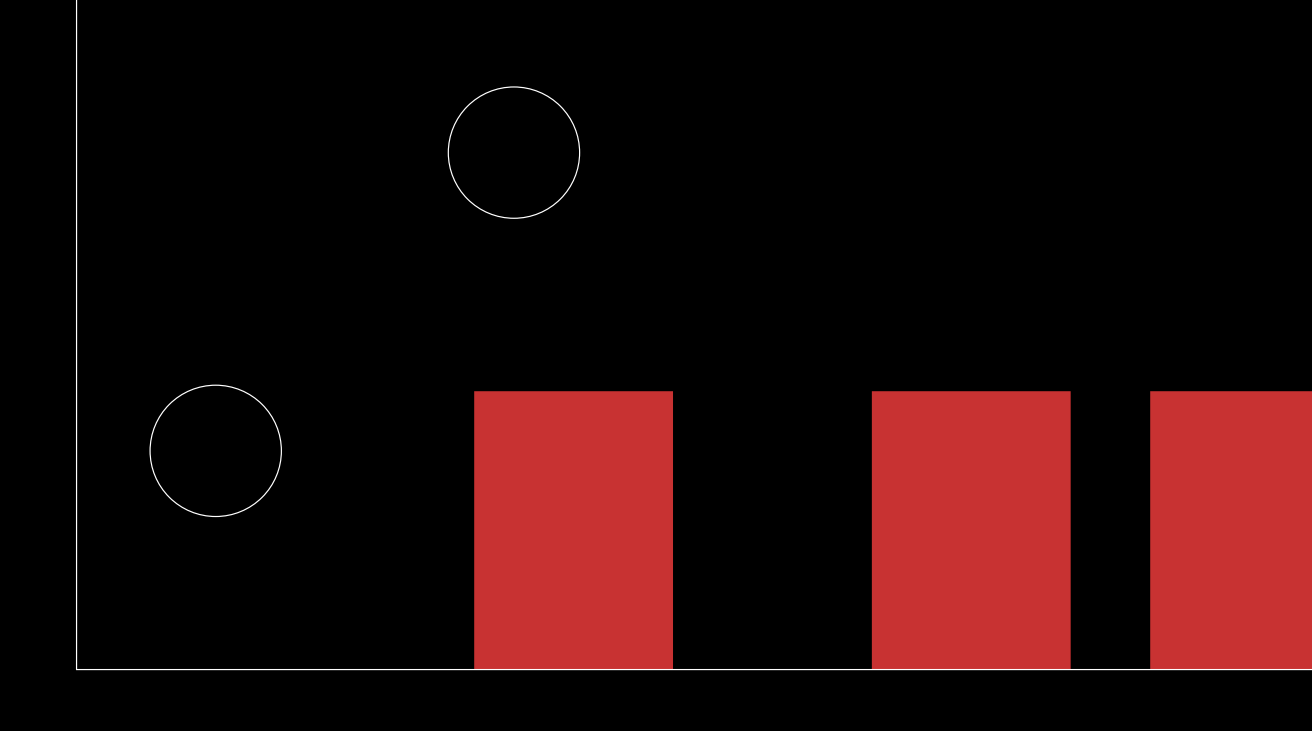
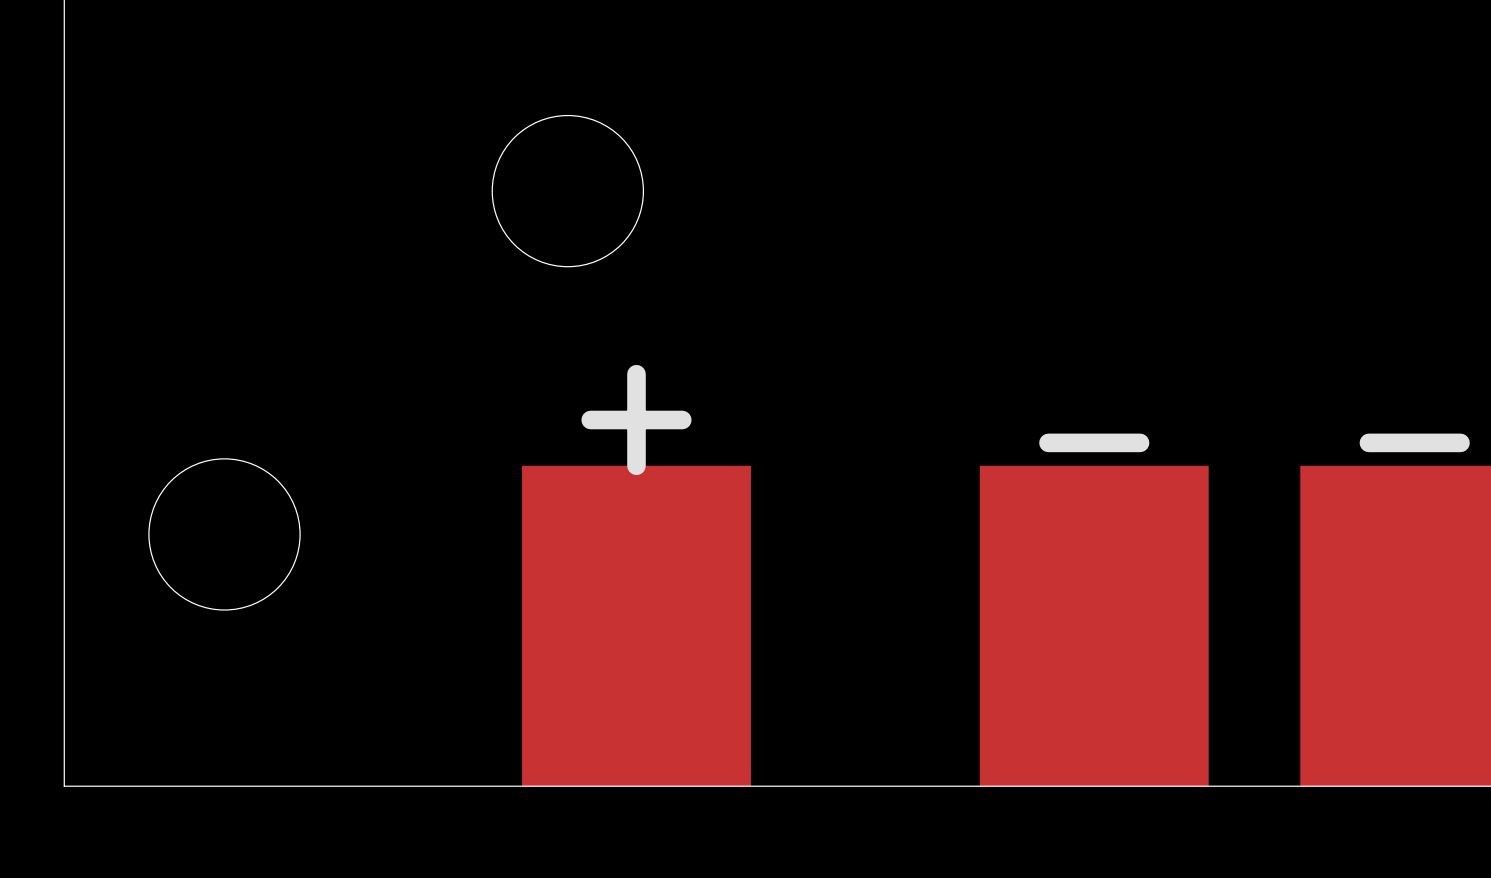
line: none -> (636, 374) (636, 465)
line: none -> (590, 420) (682, 420)
line: none -> (1048, 442) (1140, 442)
line: none -> (1368, 442) (1460, 442)

